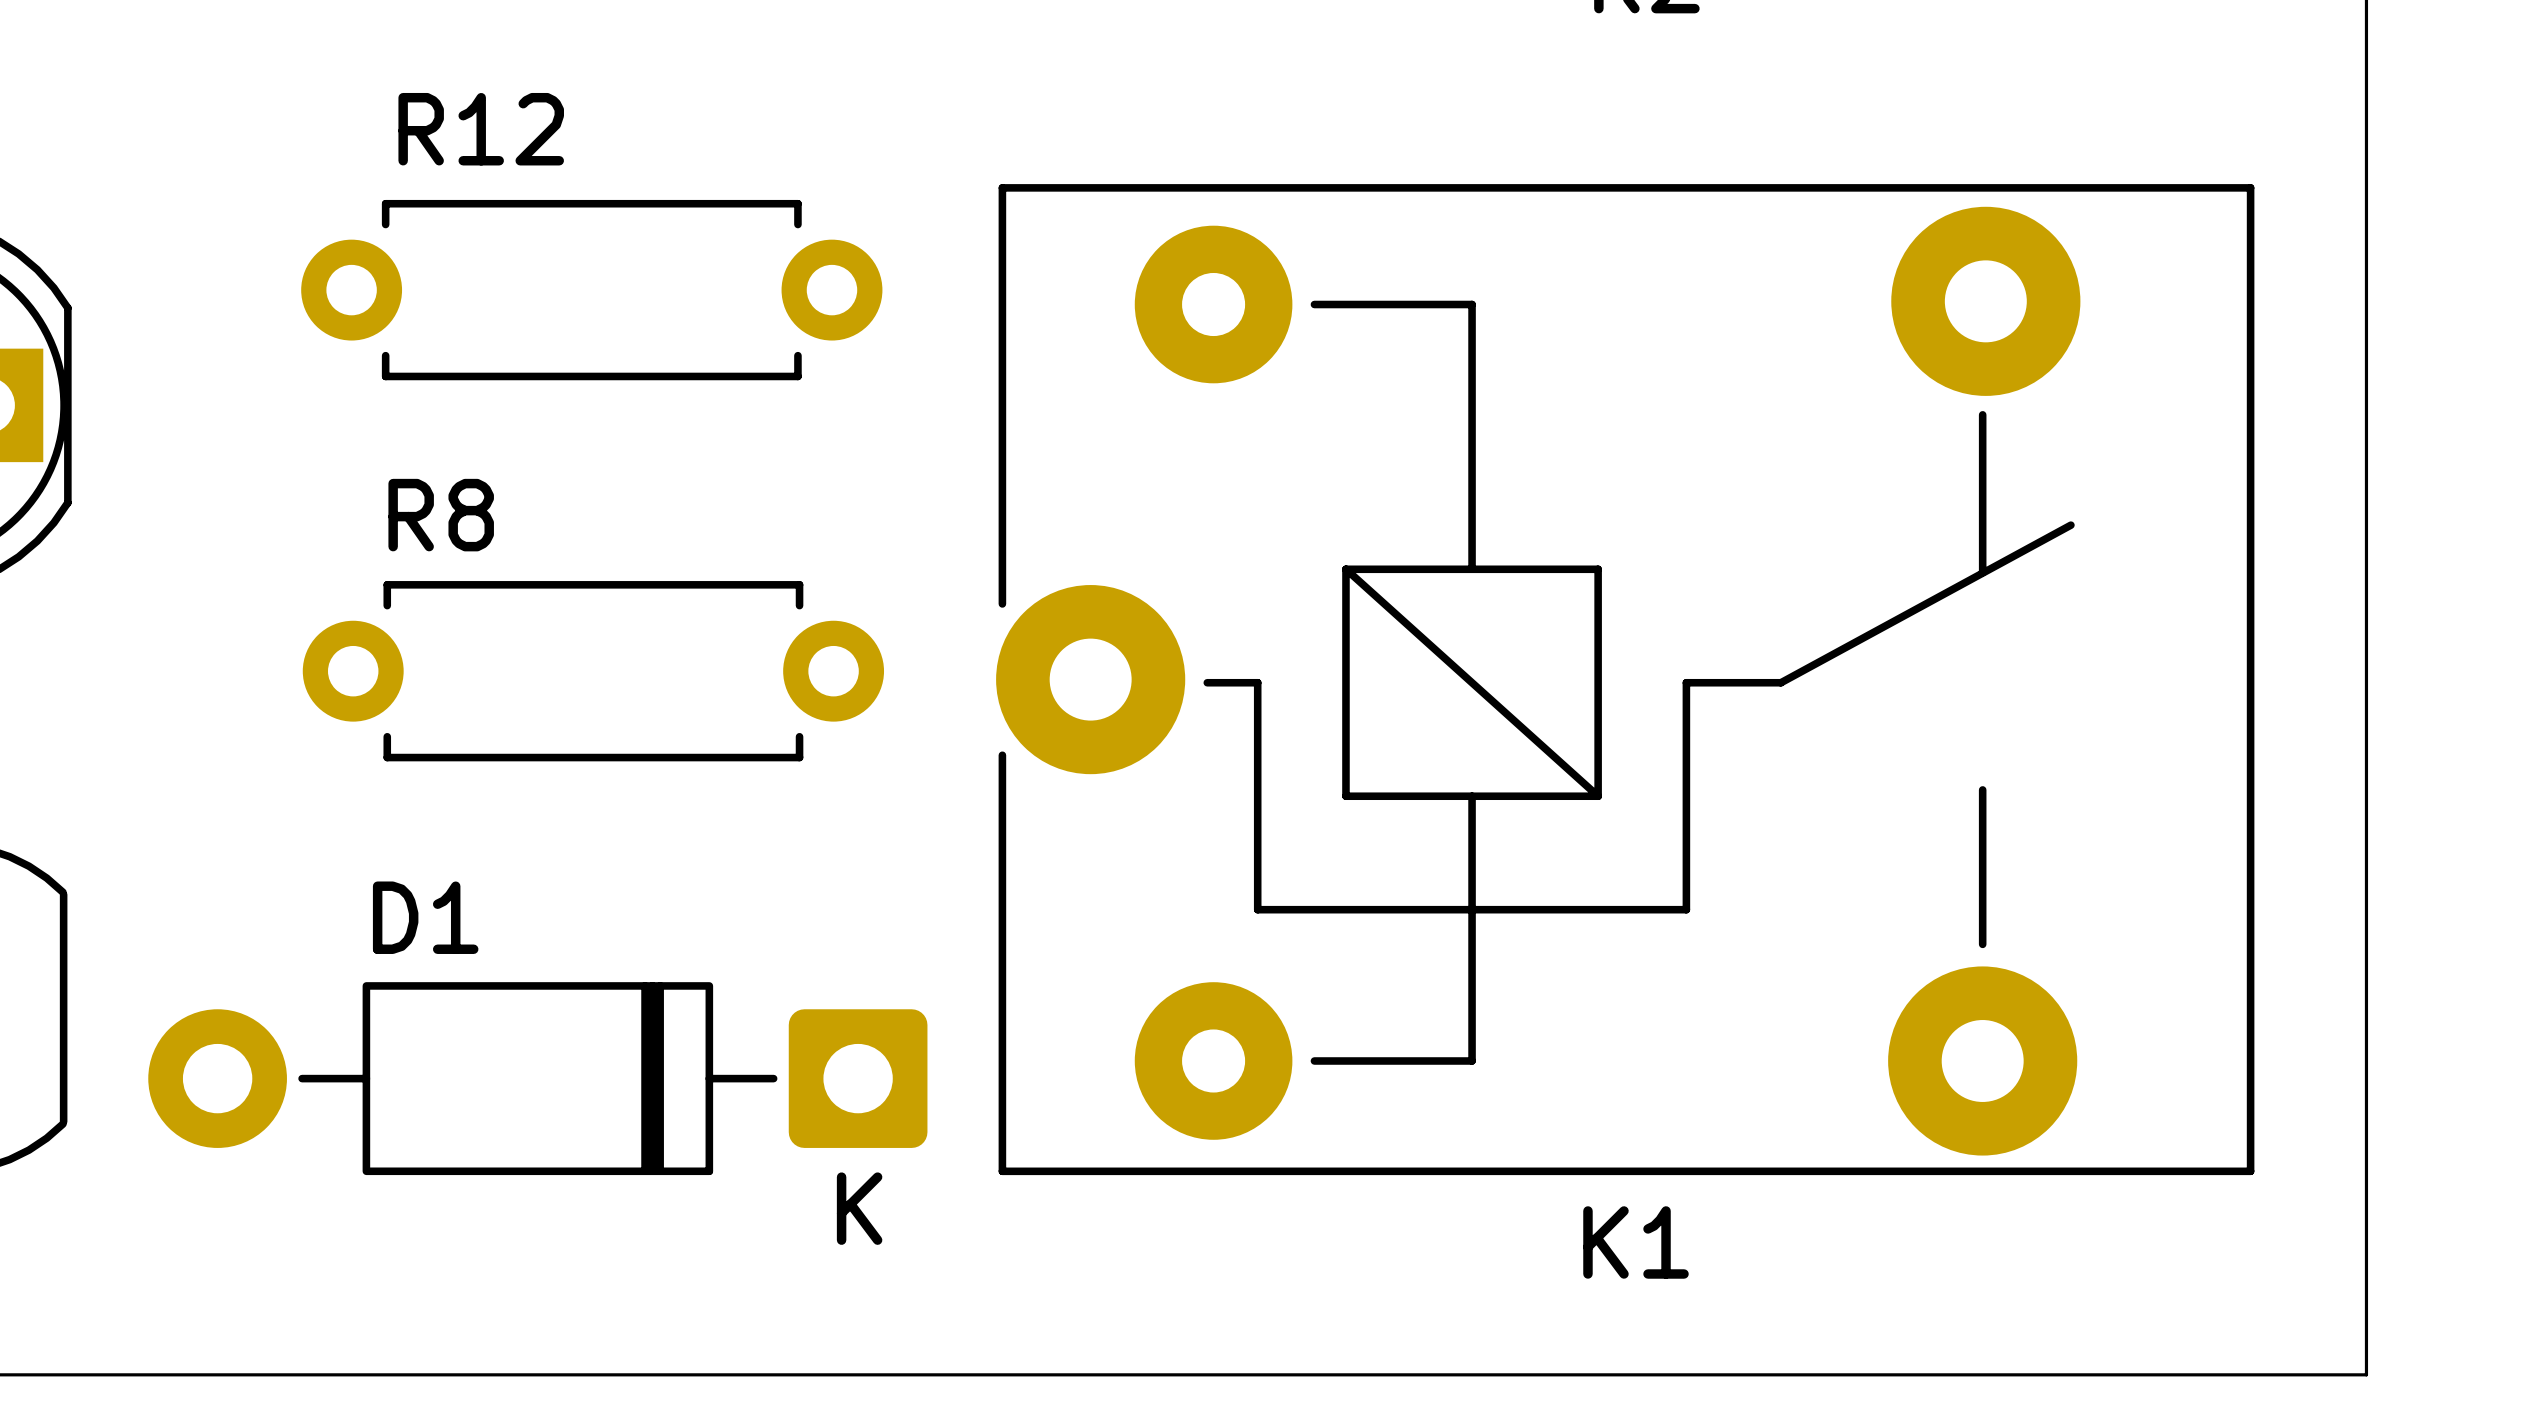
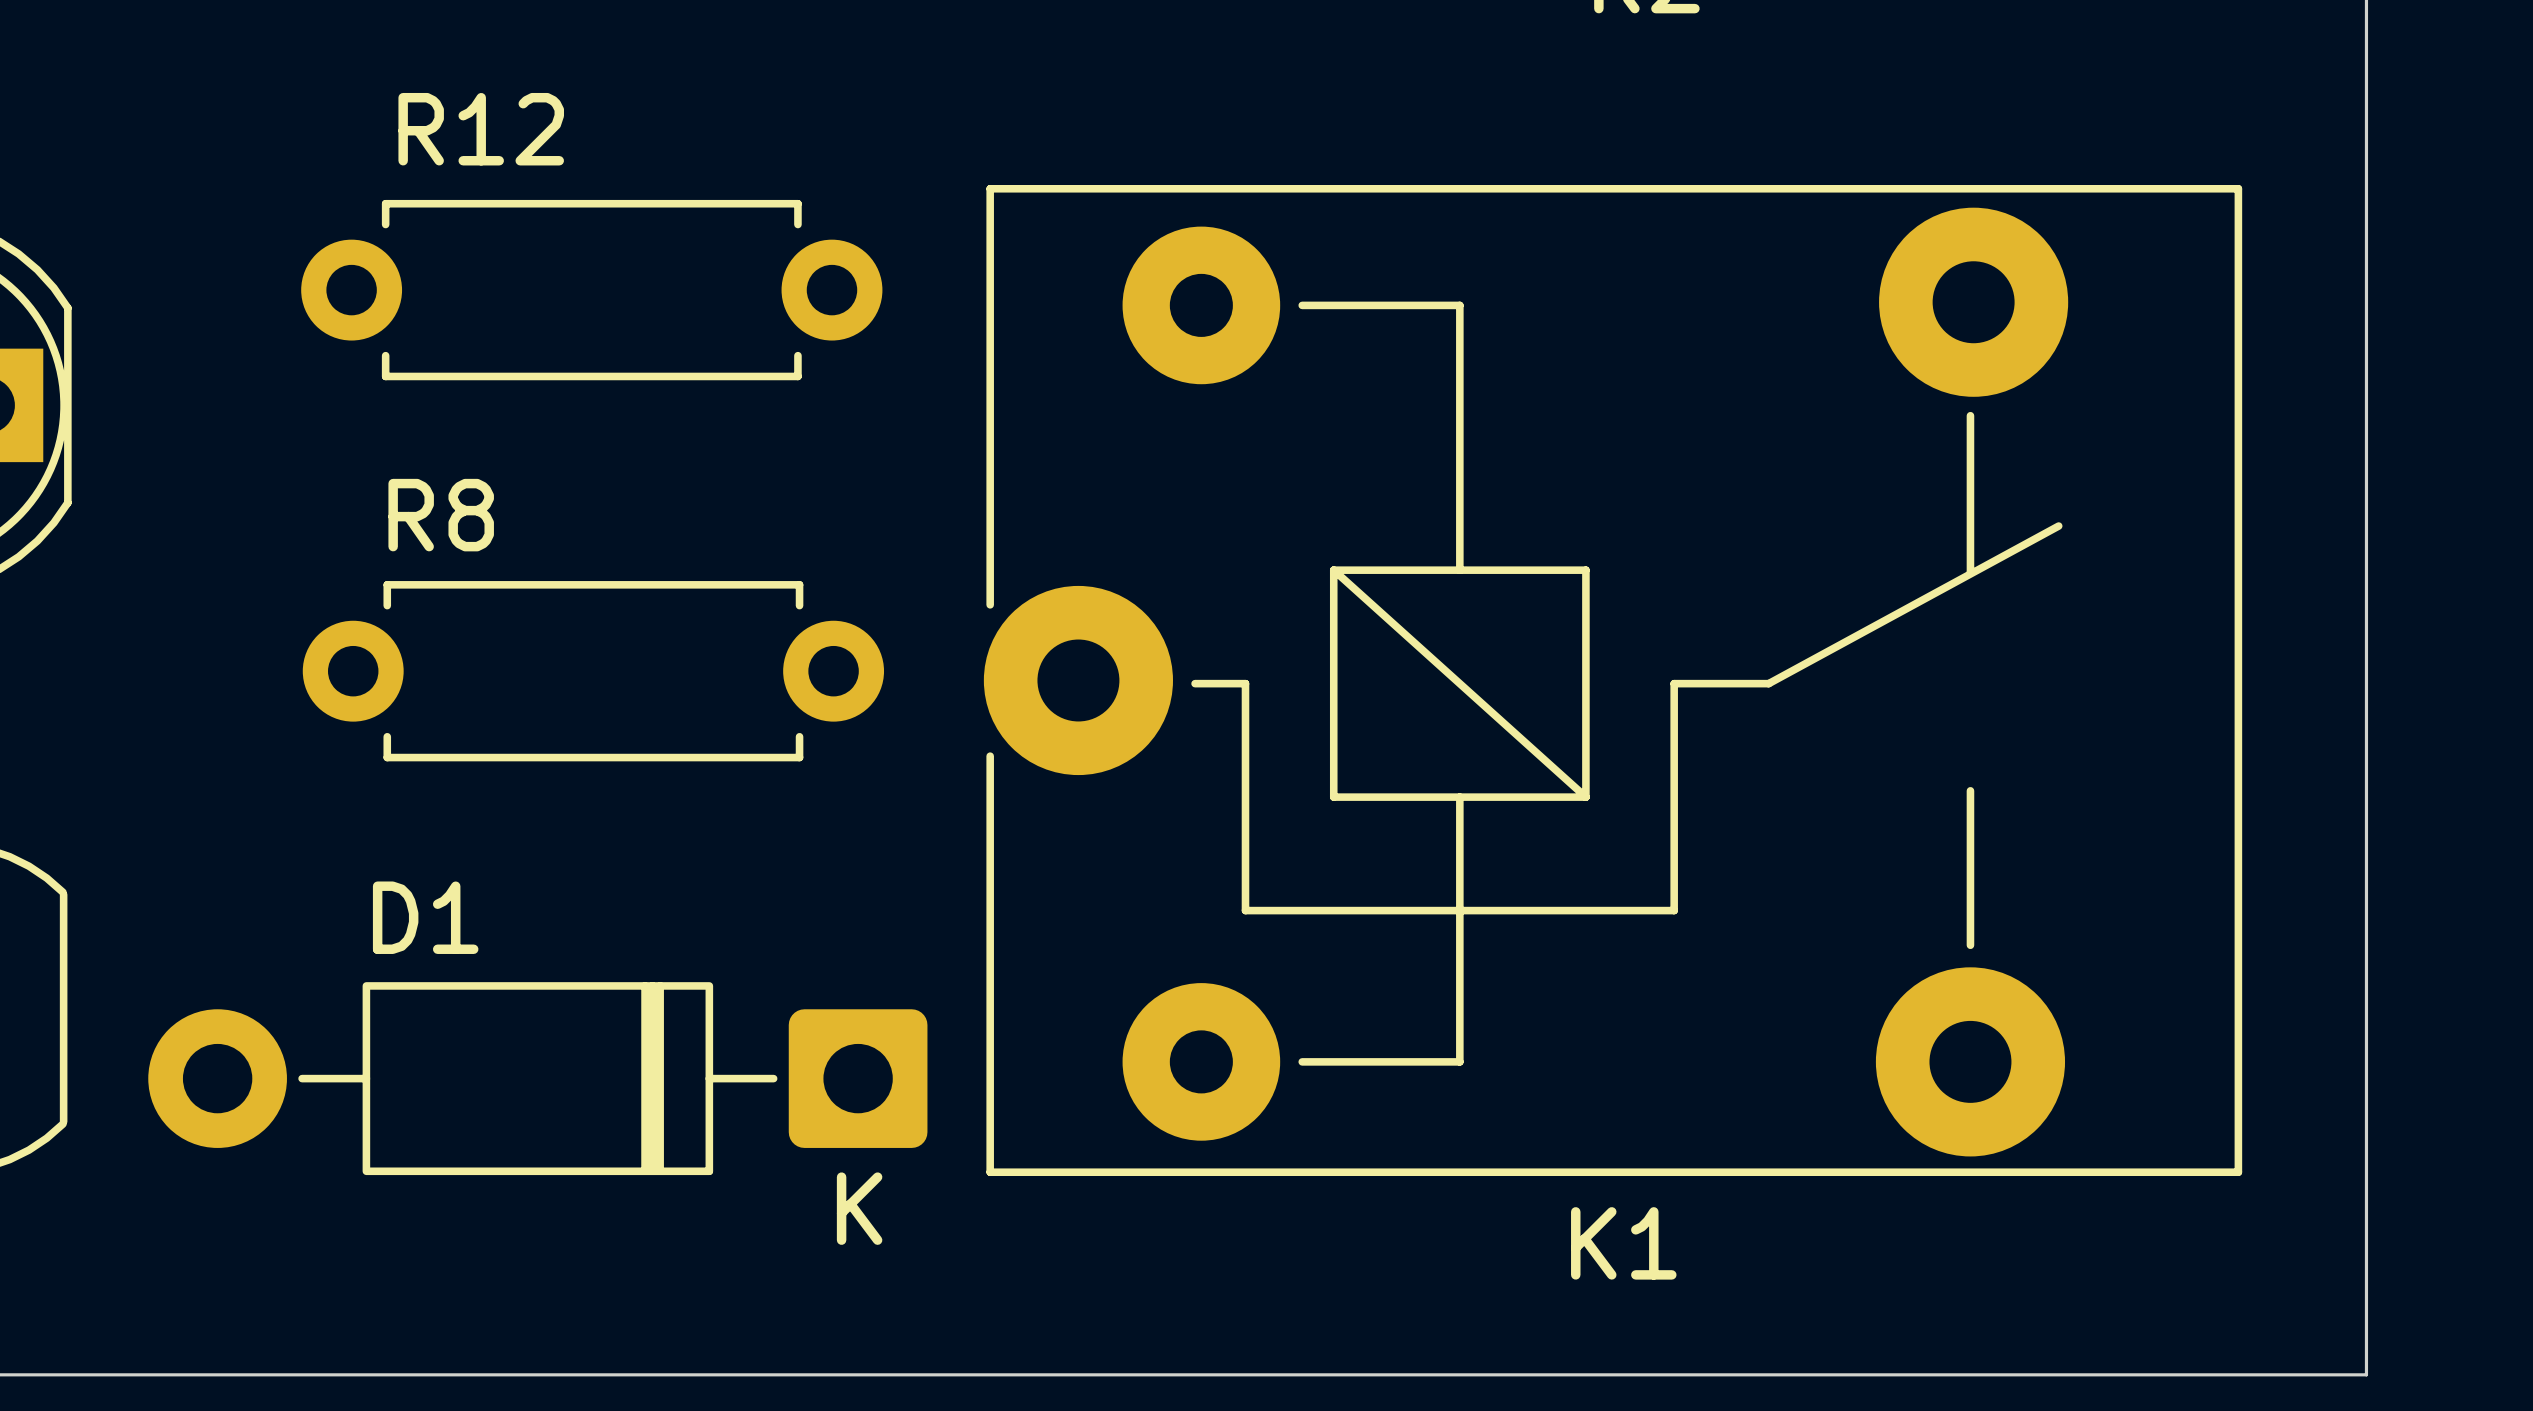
K1 position: (1625, 679) -> (1613, 680)

